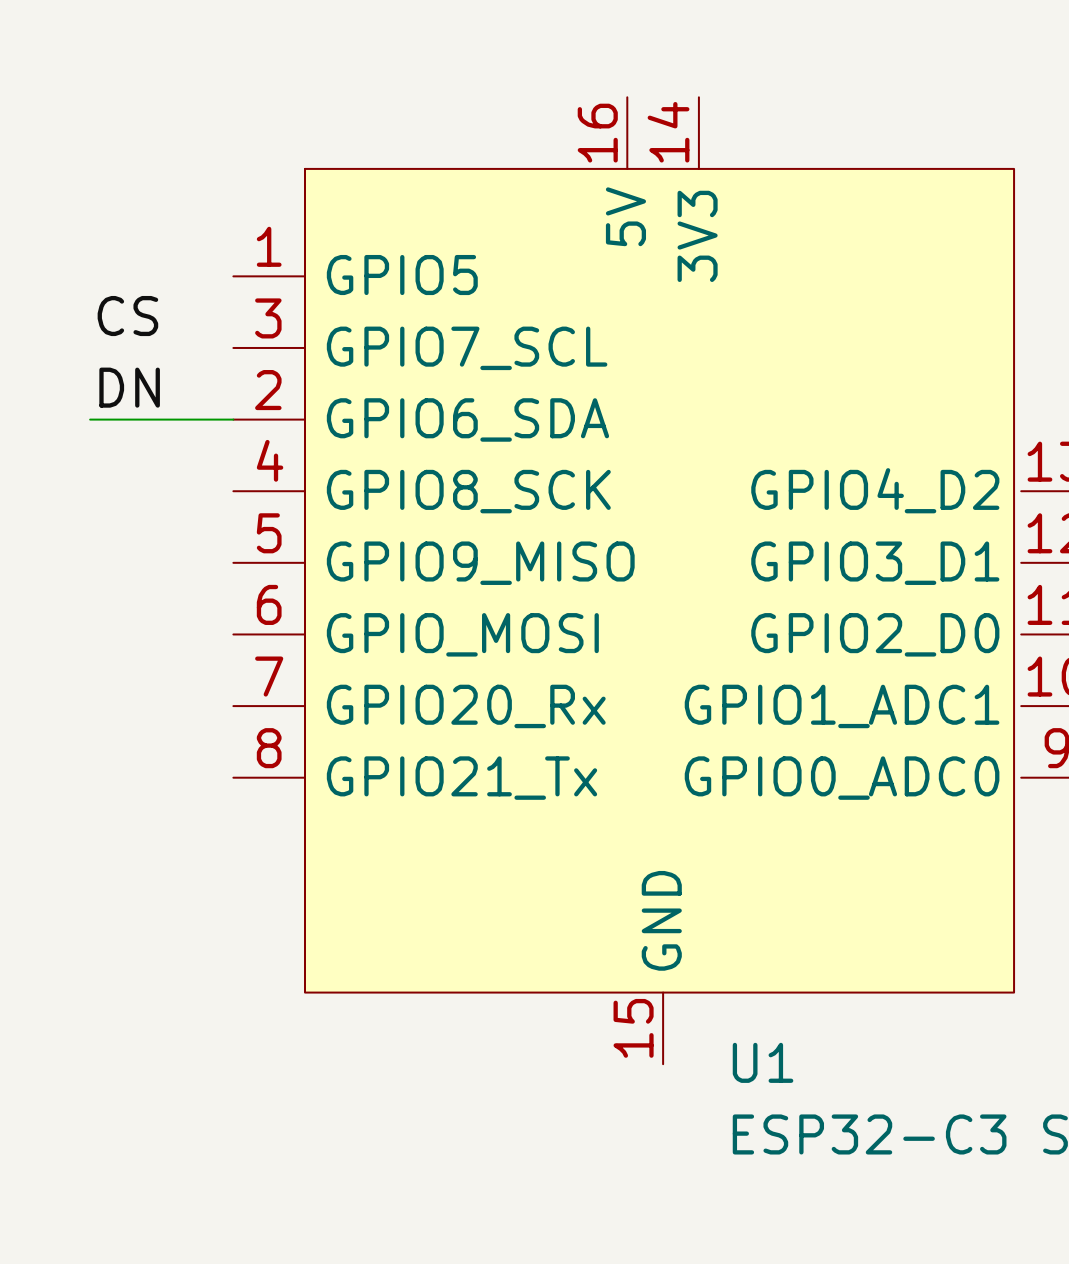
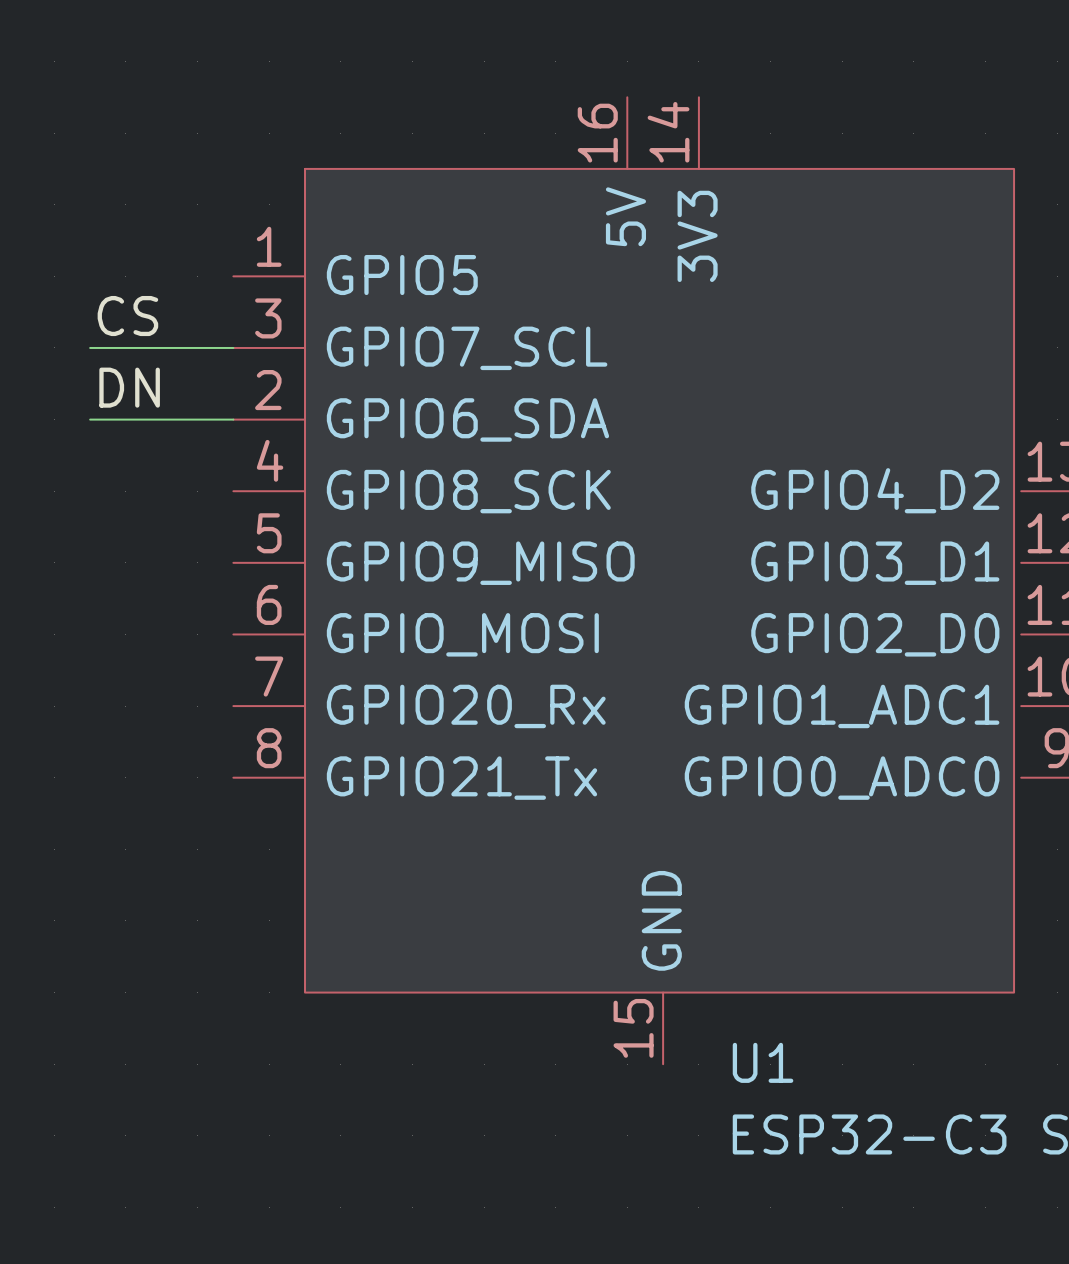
wire: none -> (90, 347) (233, 347)

